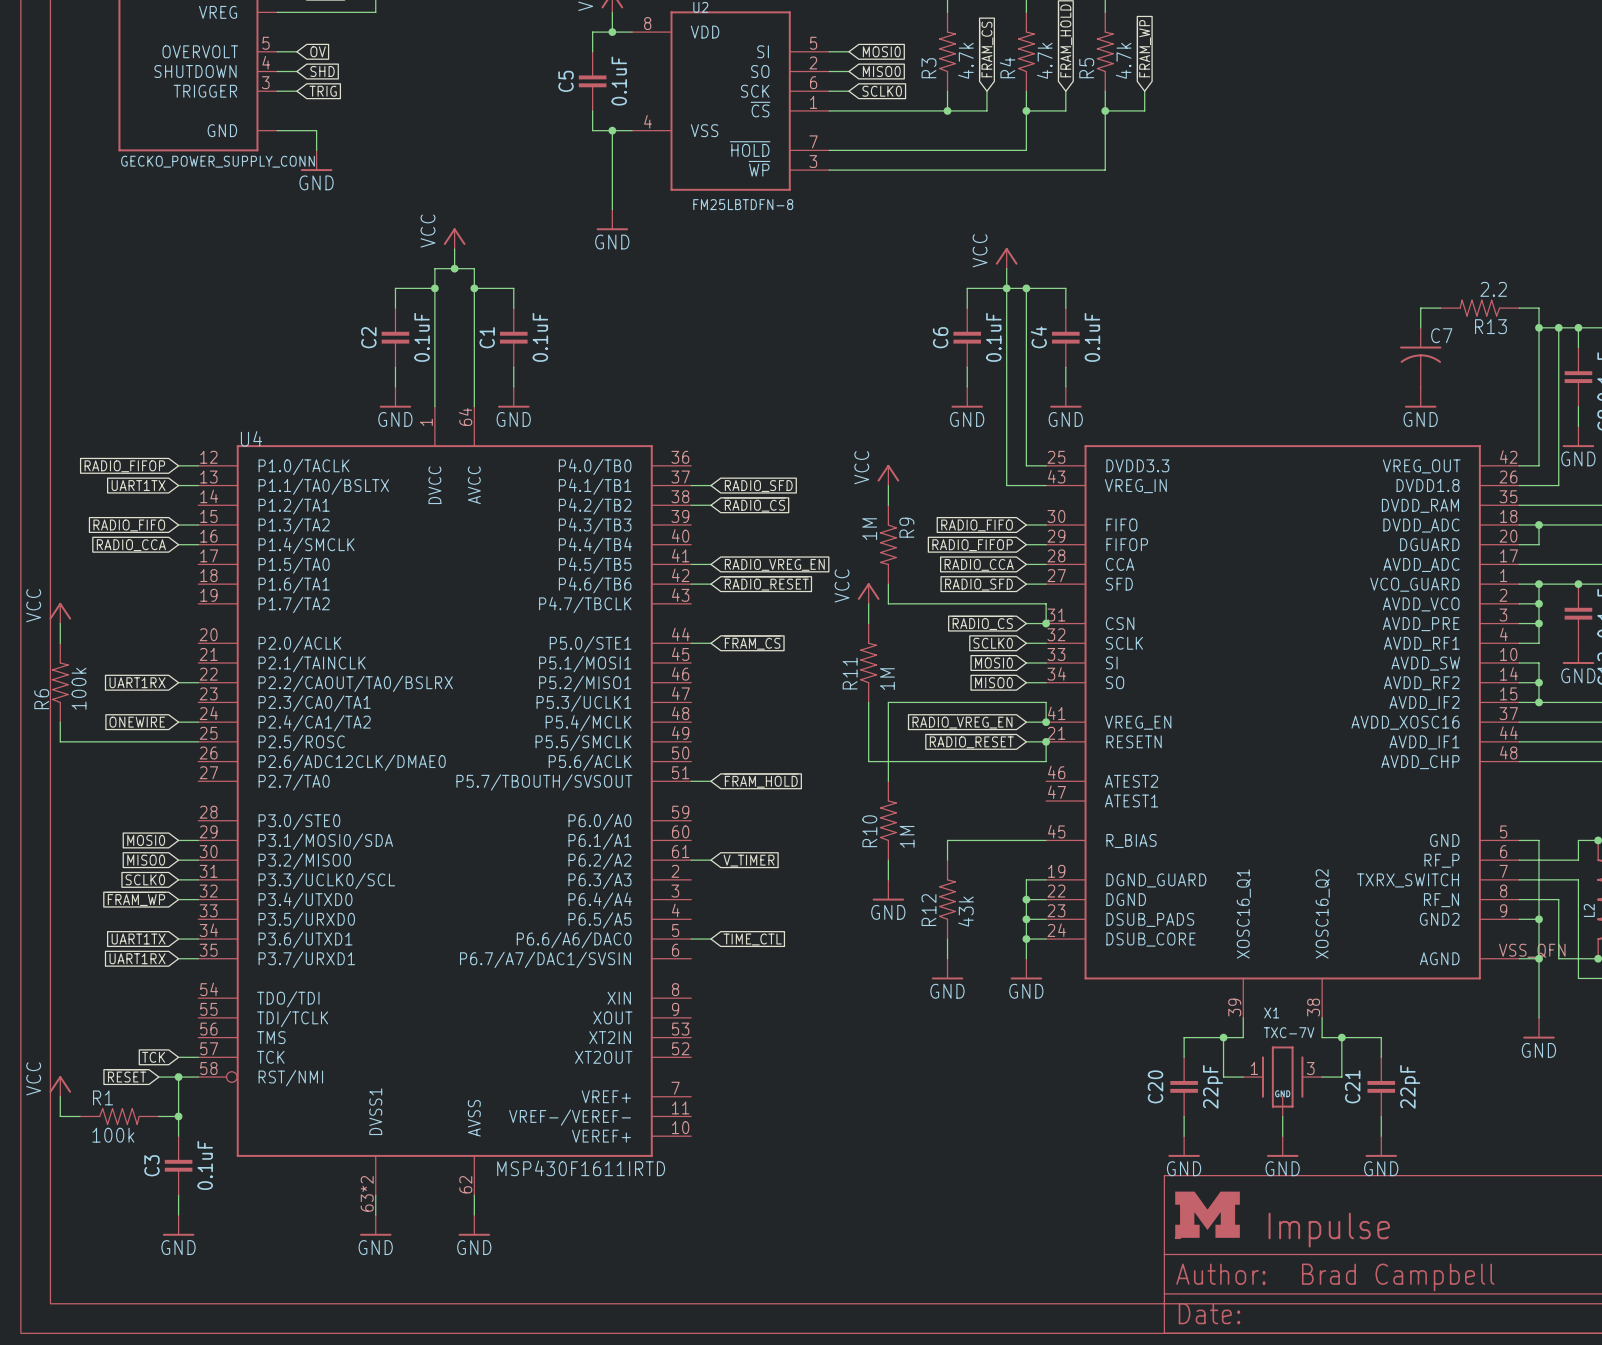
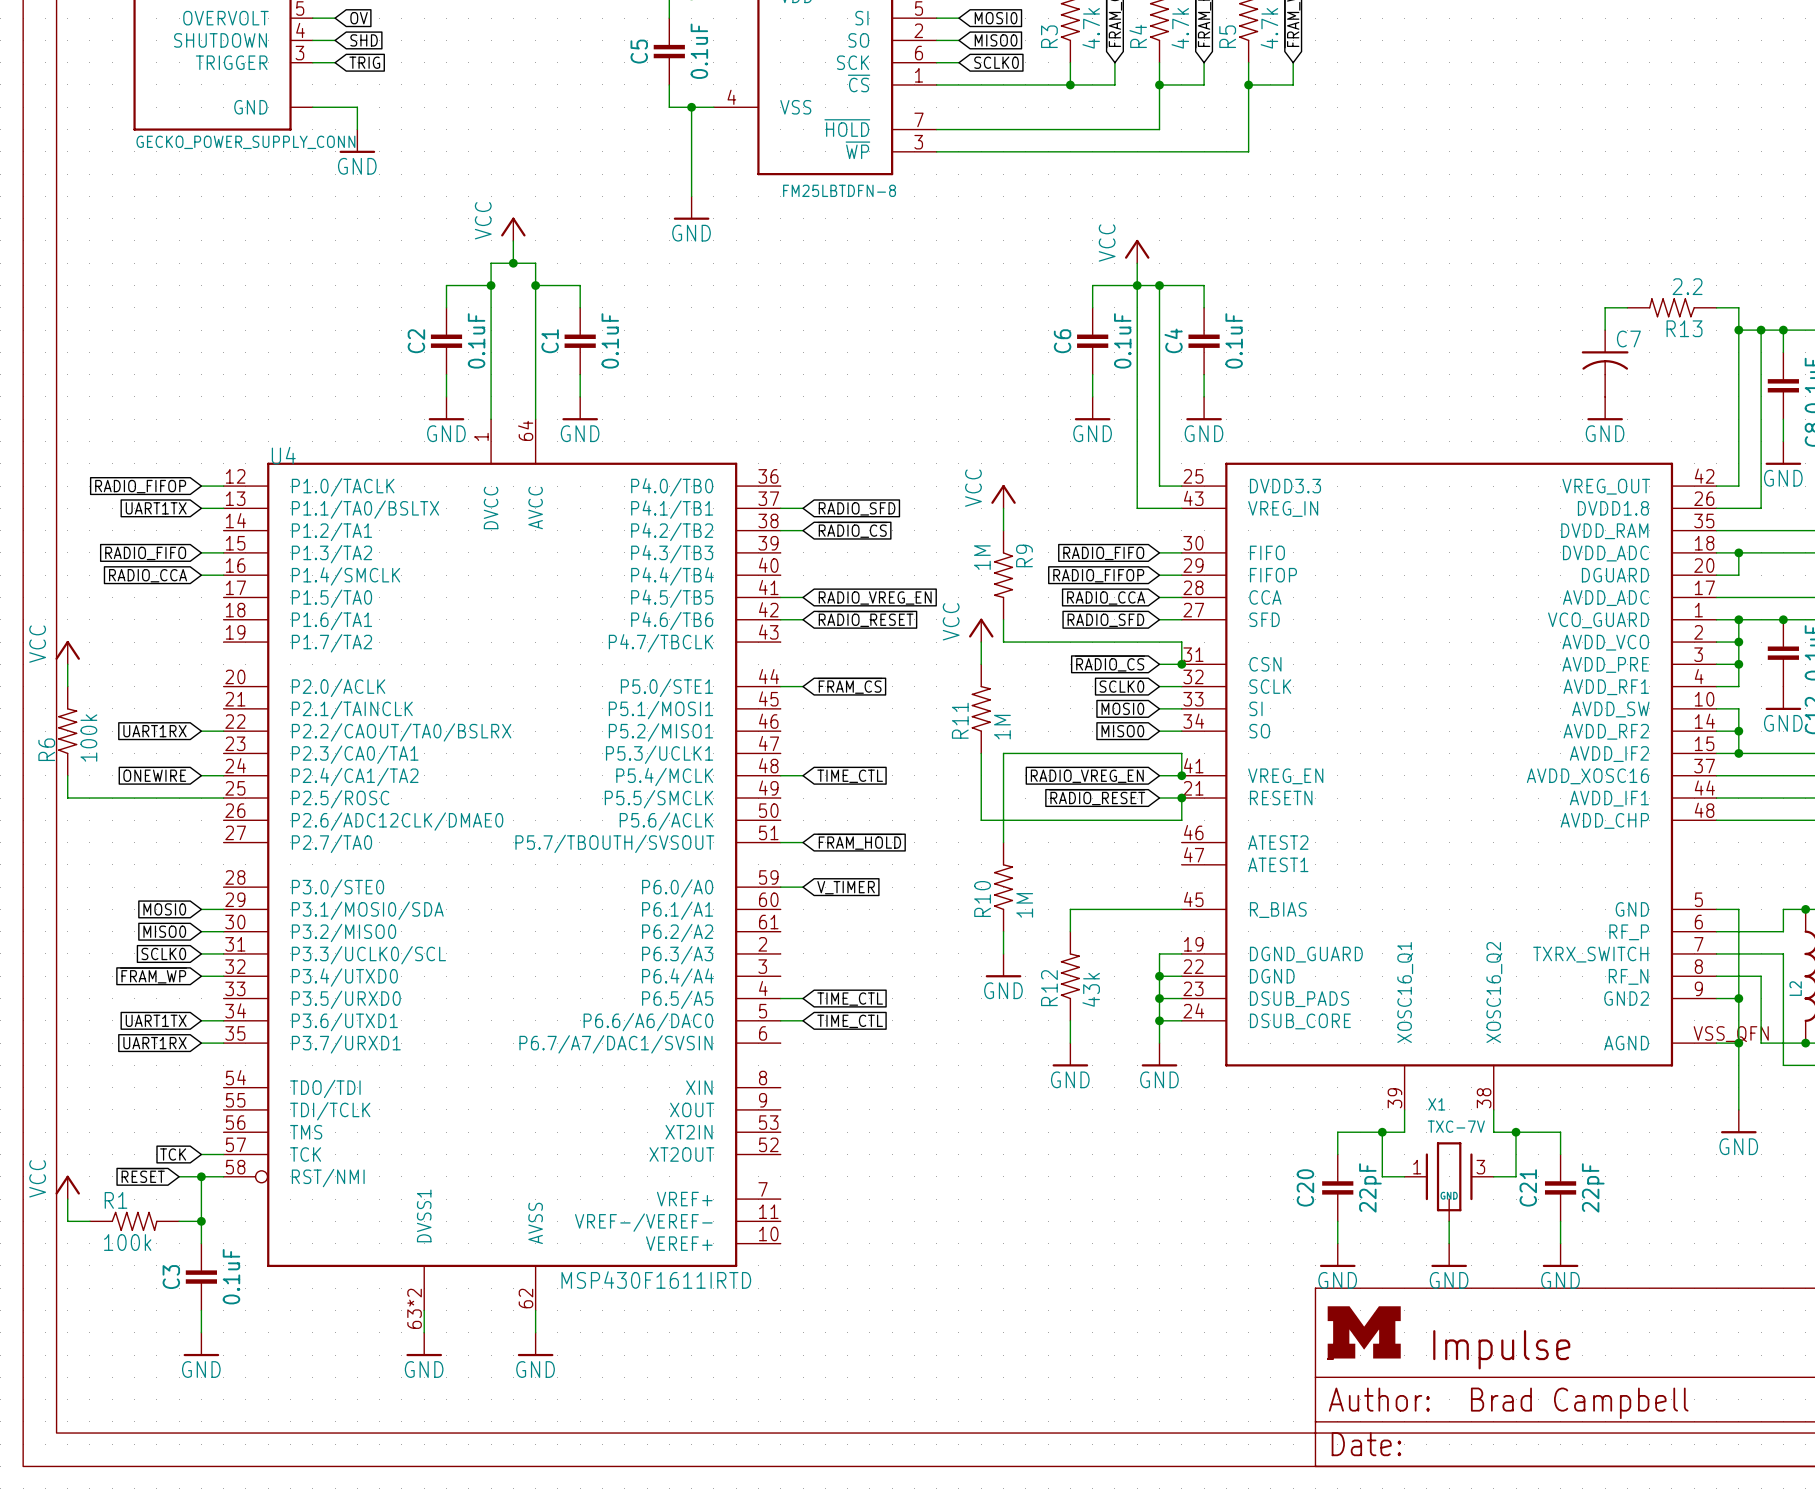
wire: none -> (780, 775) (803, 775)
global label: none -> TIME_CTL (850, 776)
wire: (691, 860) (710, 860) -> (780, 887) (803, 887)
global label position: V_TIMER (749, 860) -> V_TIMER (846, 887)
wire: none -> (780, 998) (803, 998)
global label: none -> TIME_CTL (850, 999)

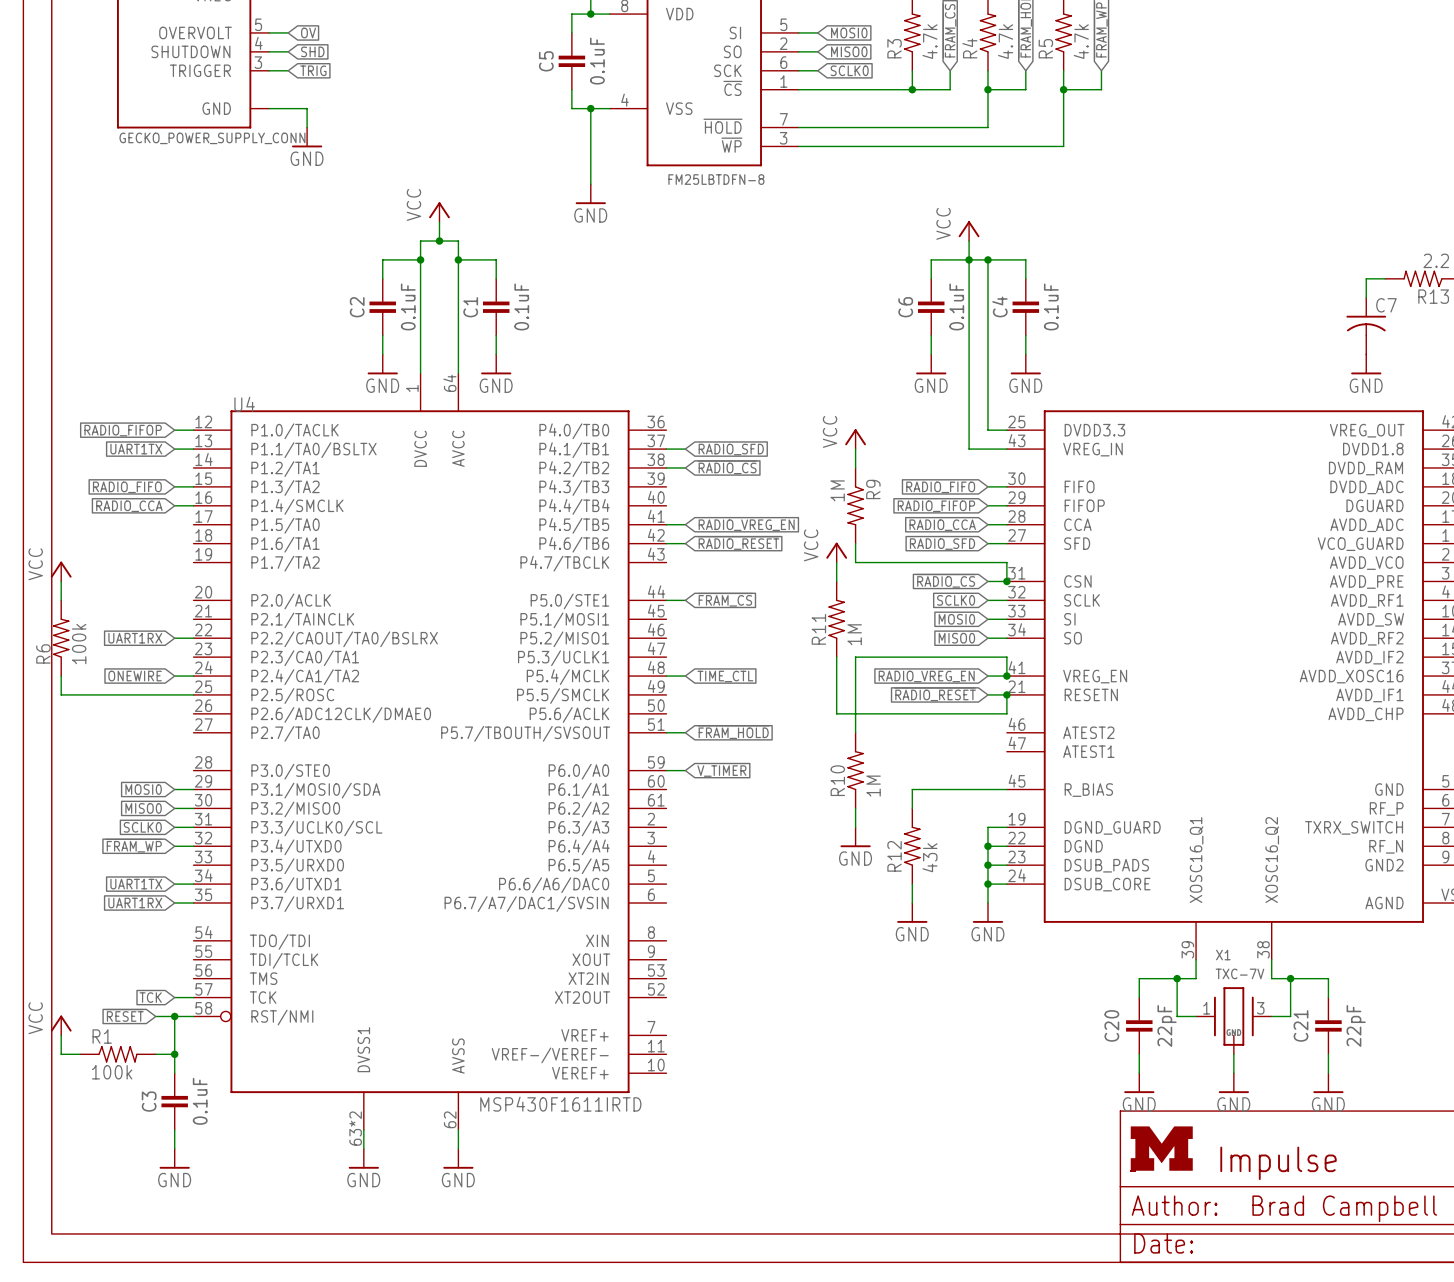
wire: (780, 998) (803, 998) -> none
global label: TIME_CTL (850, 999) -> none
wire: (780, 1020) (803, 1020) -> none
global label: TIME_CTL (850, 1021) -> none

